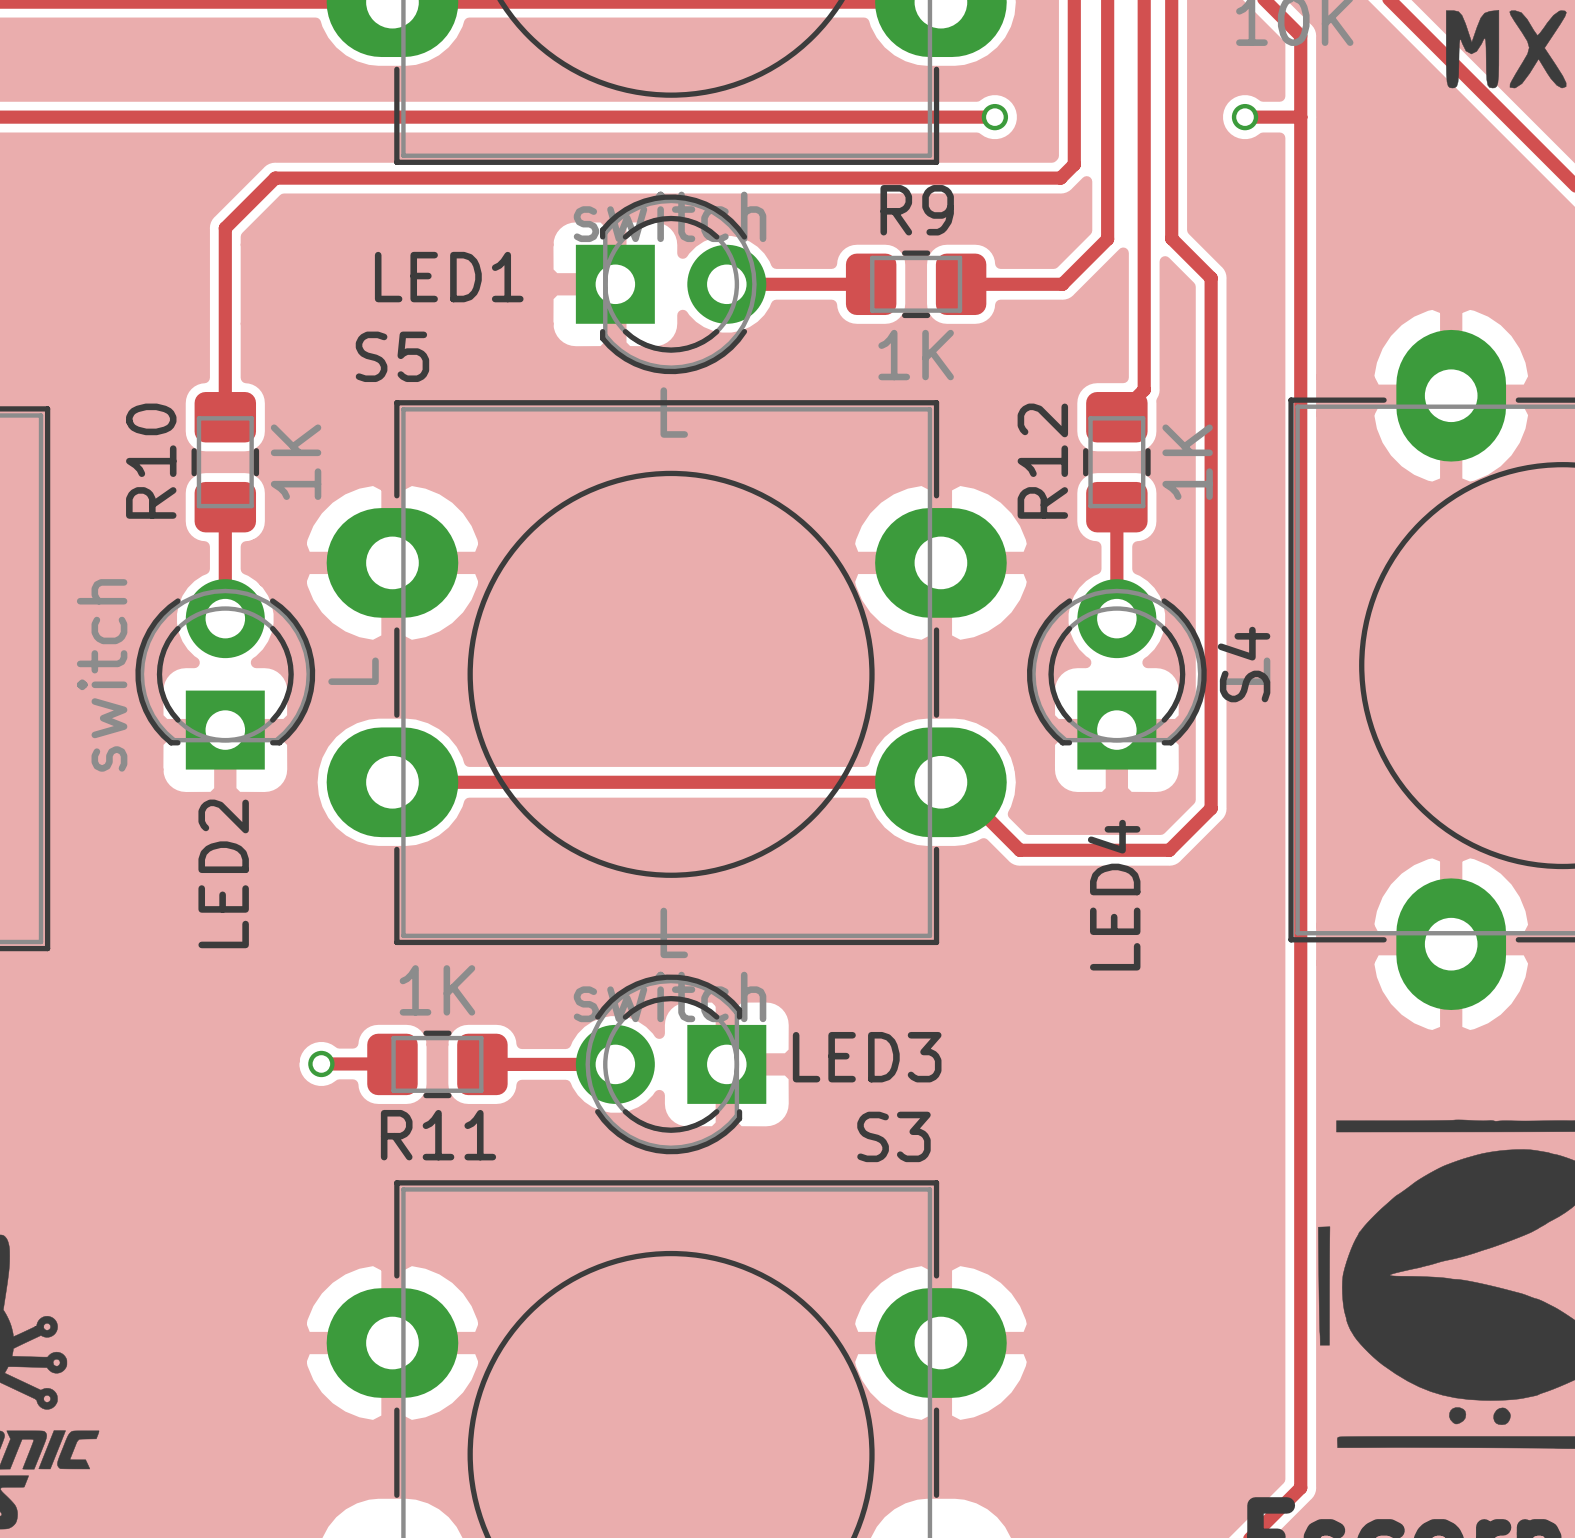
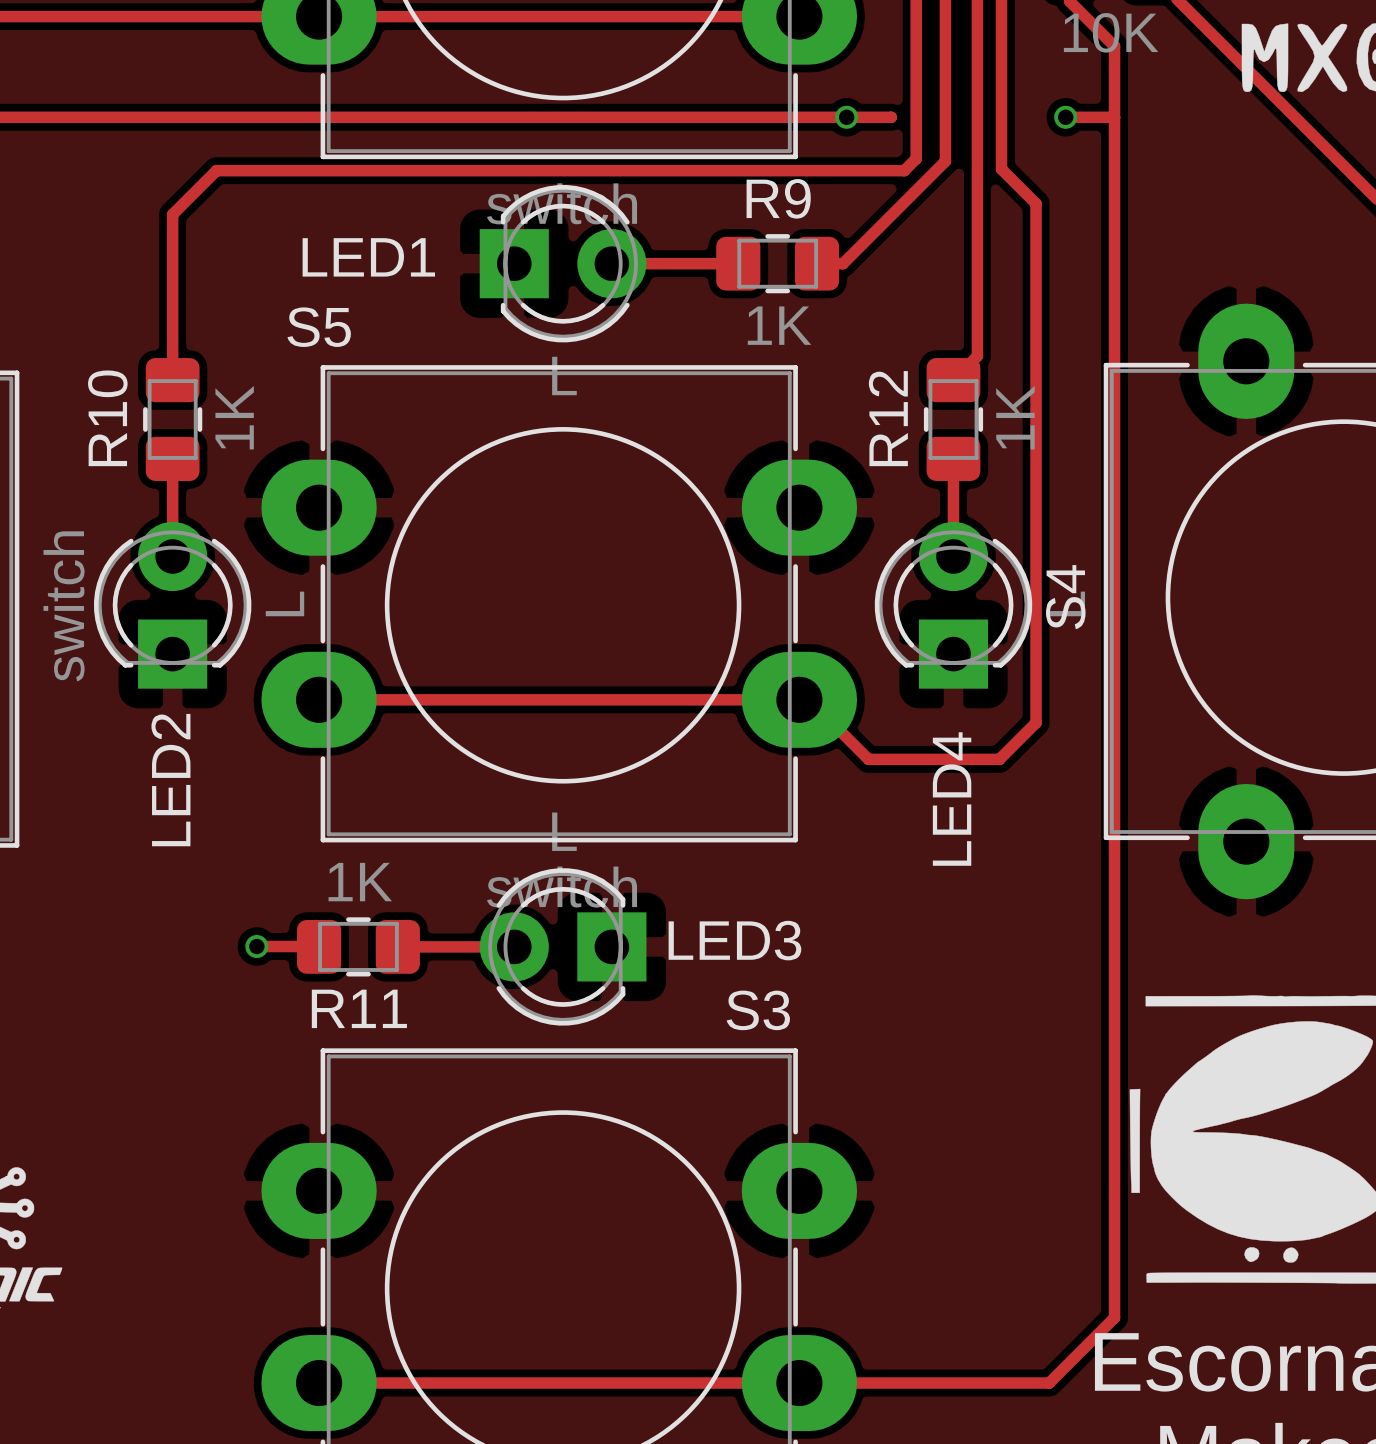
track: none -> (846, 117) (891, 117)
track: (1107, 167) (1107, 239) (1062, 284) (990, 284) -> (945, 161) (843, 263)
track: (1171, 176) (1171, 238) (1211, 278) -> (1001, 169) (1036, 203) (1036, 258)

